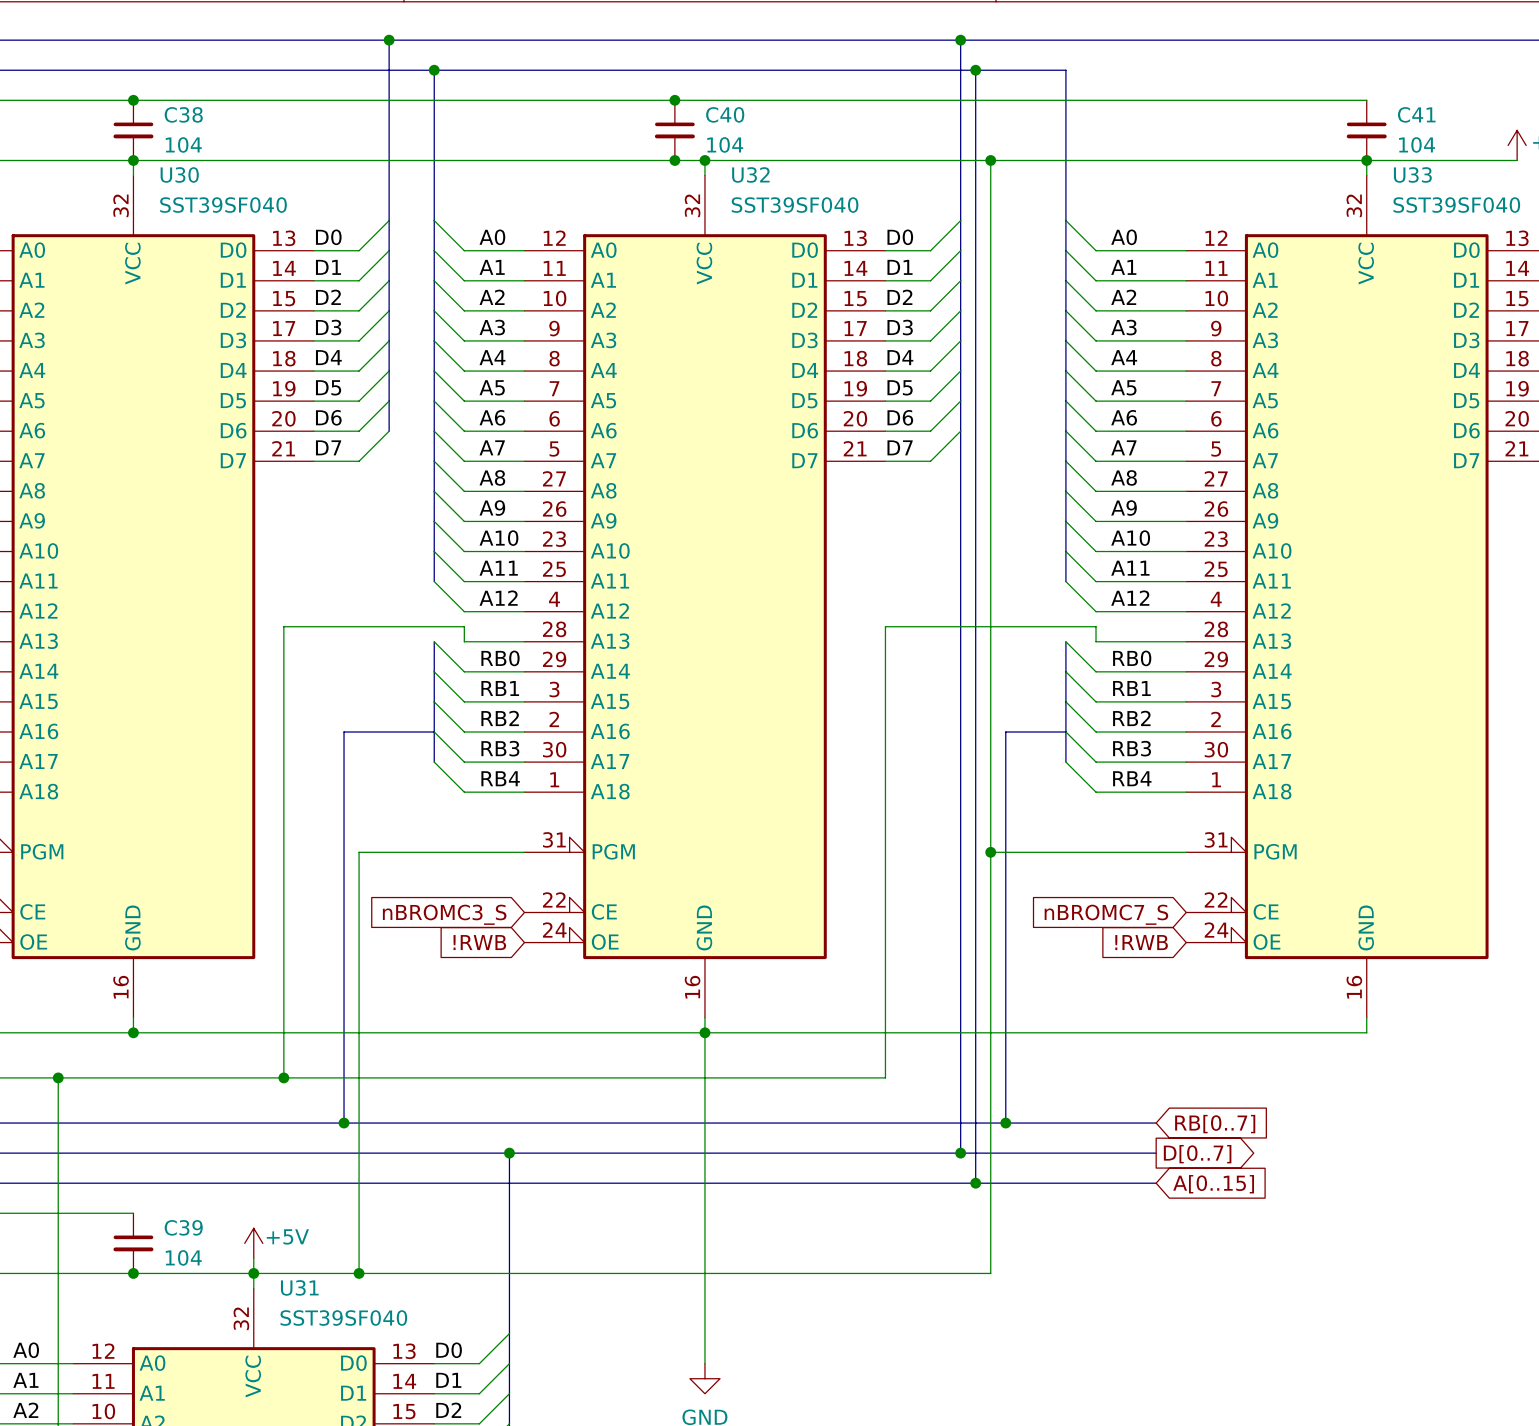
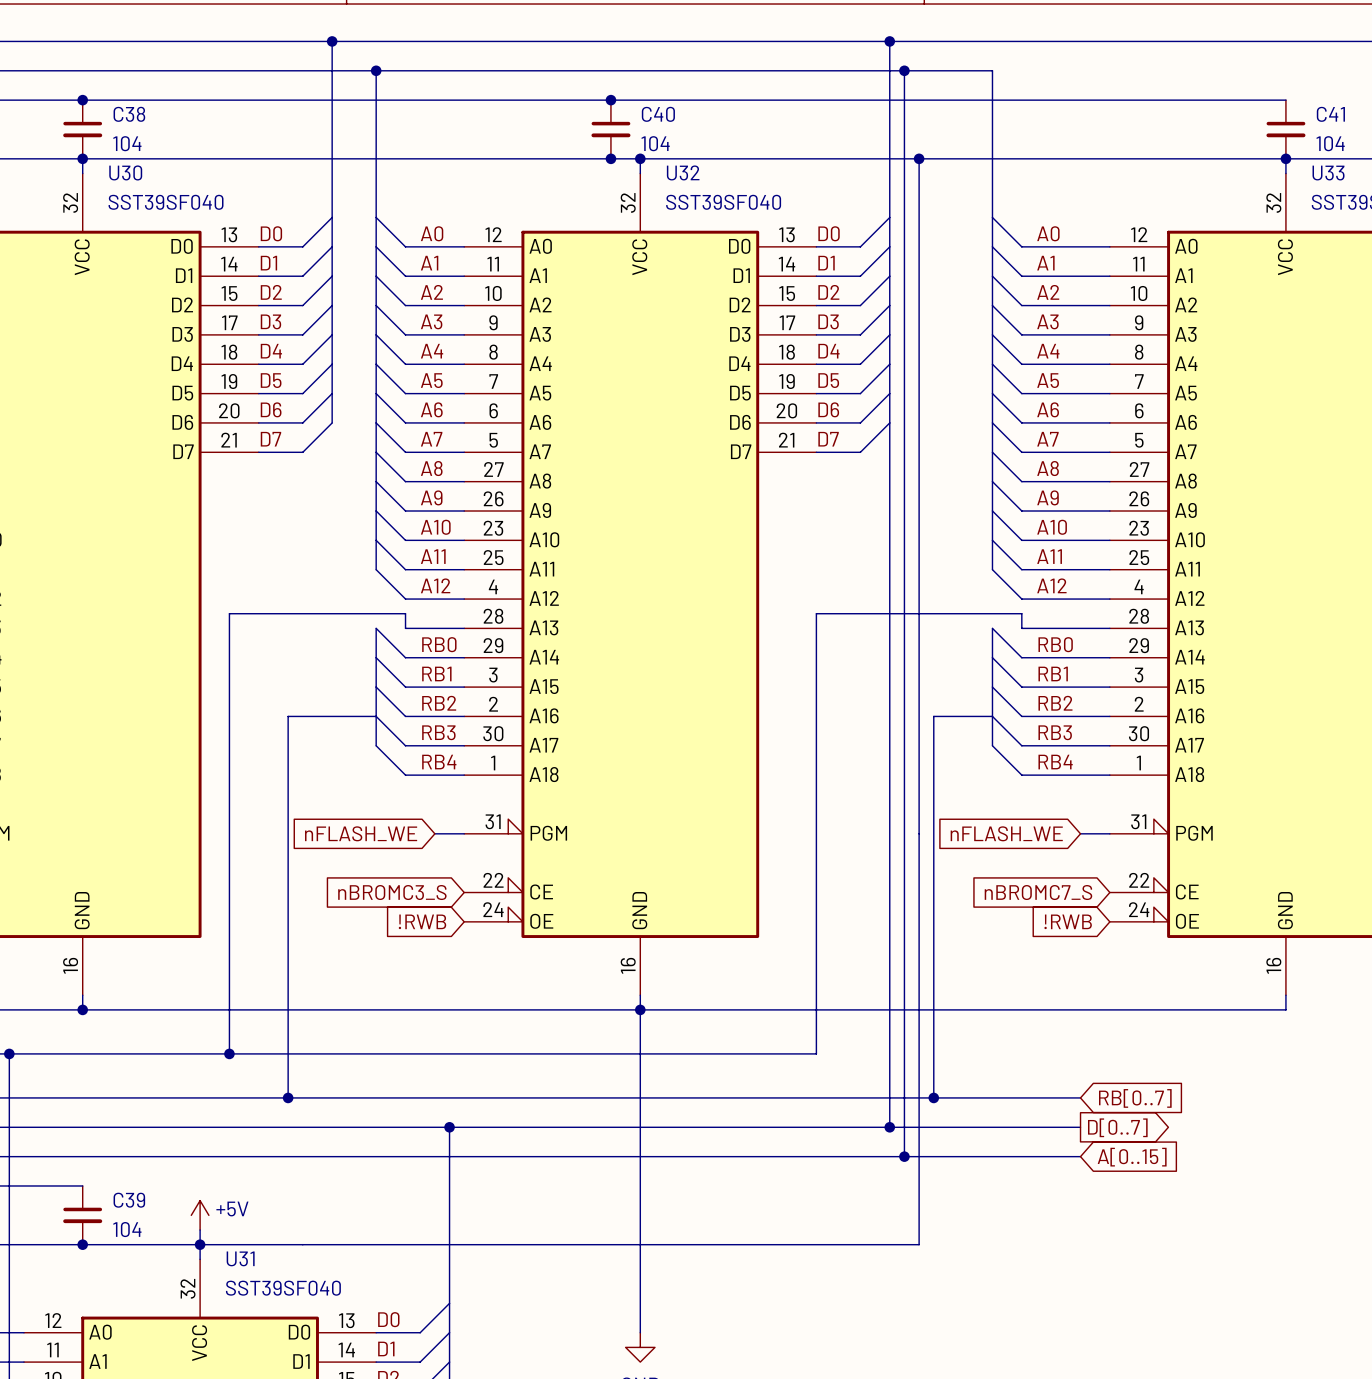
wire: (494, 852) (359, 852) (359, 1273) -> none
wire: (990, 852) (1156, 852) -> none
junction: (990, 852) -> none
global label: none -> nFLASH_WE (361, 833)
global label: none -> nFLASH_WE (1006, 833)
junction: (359, 1273) -> none

